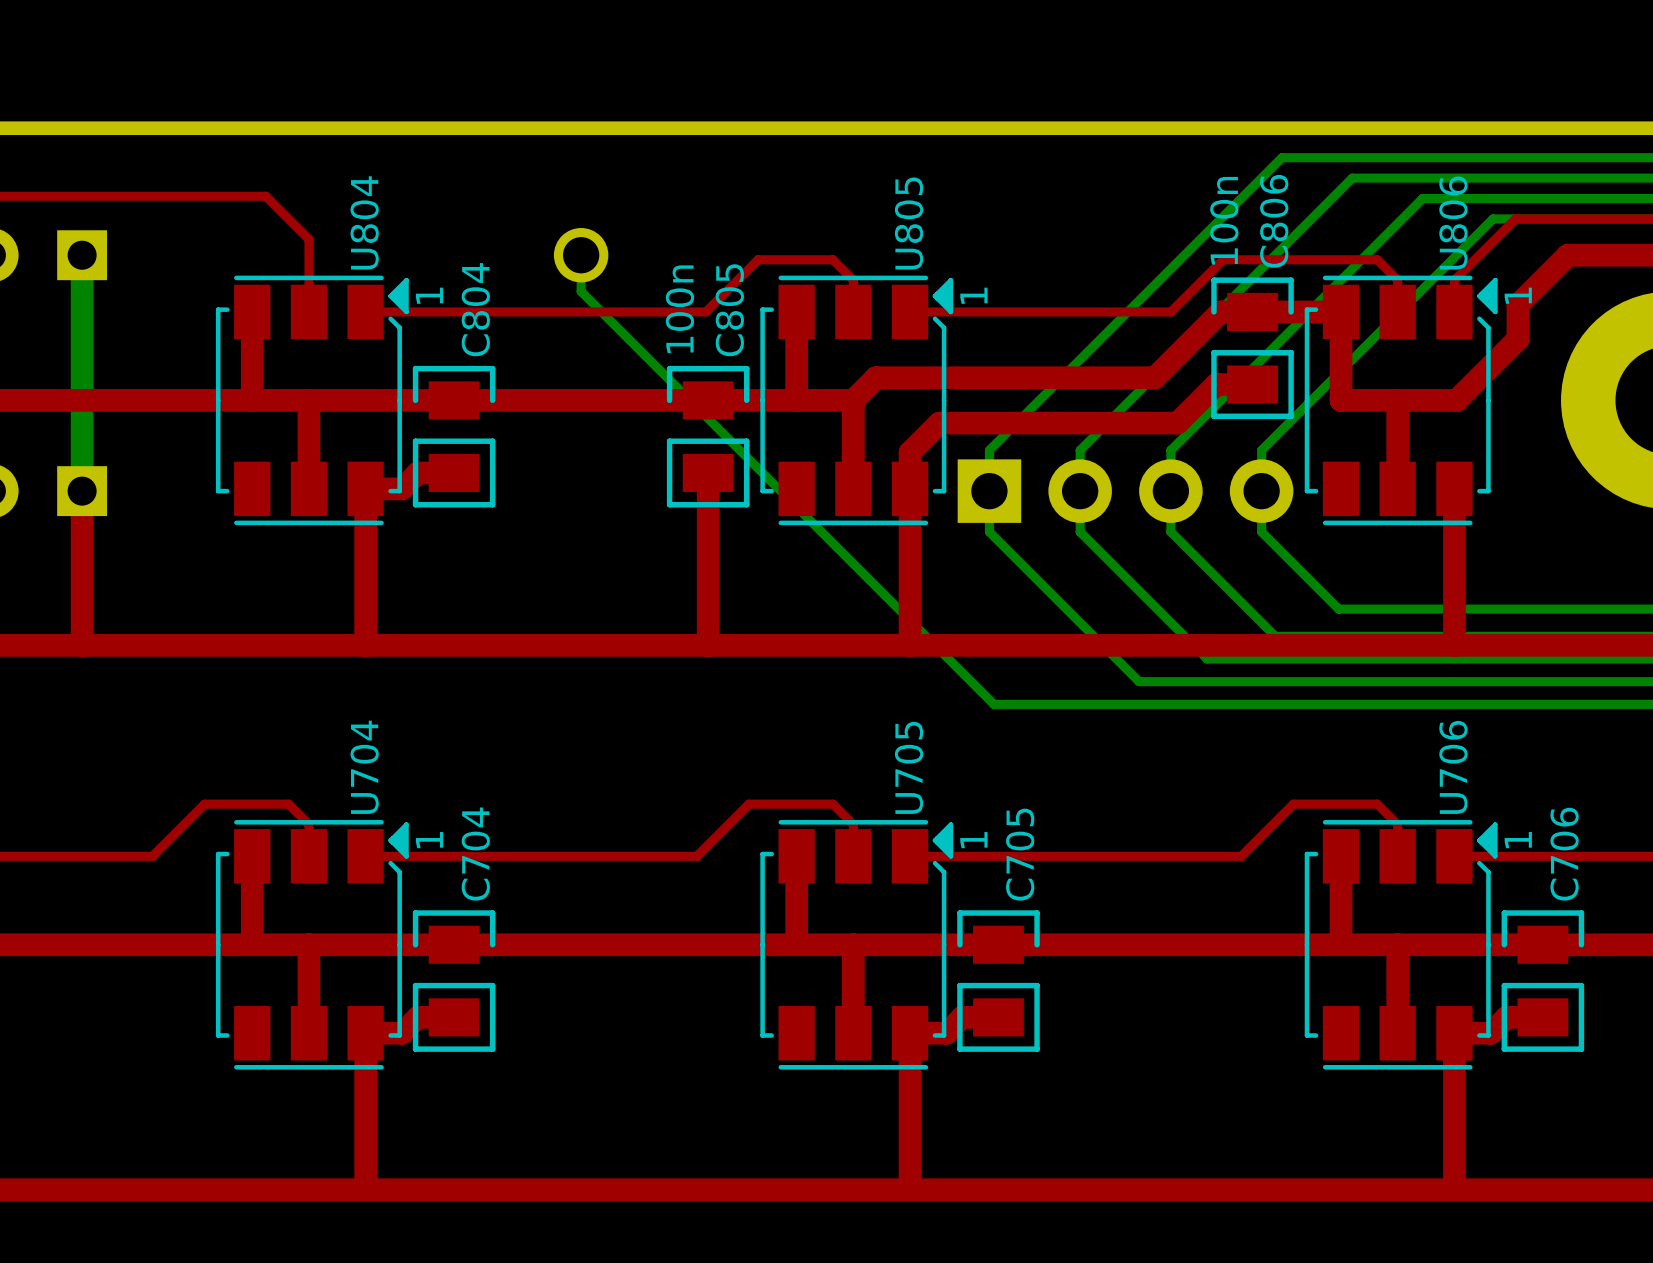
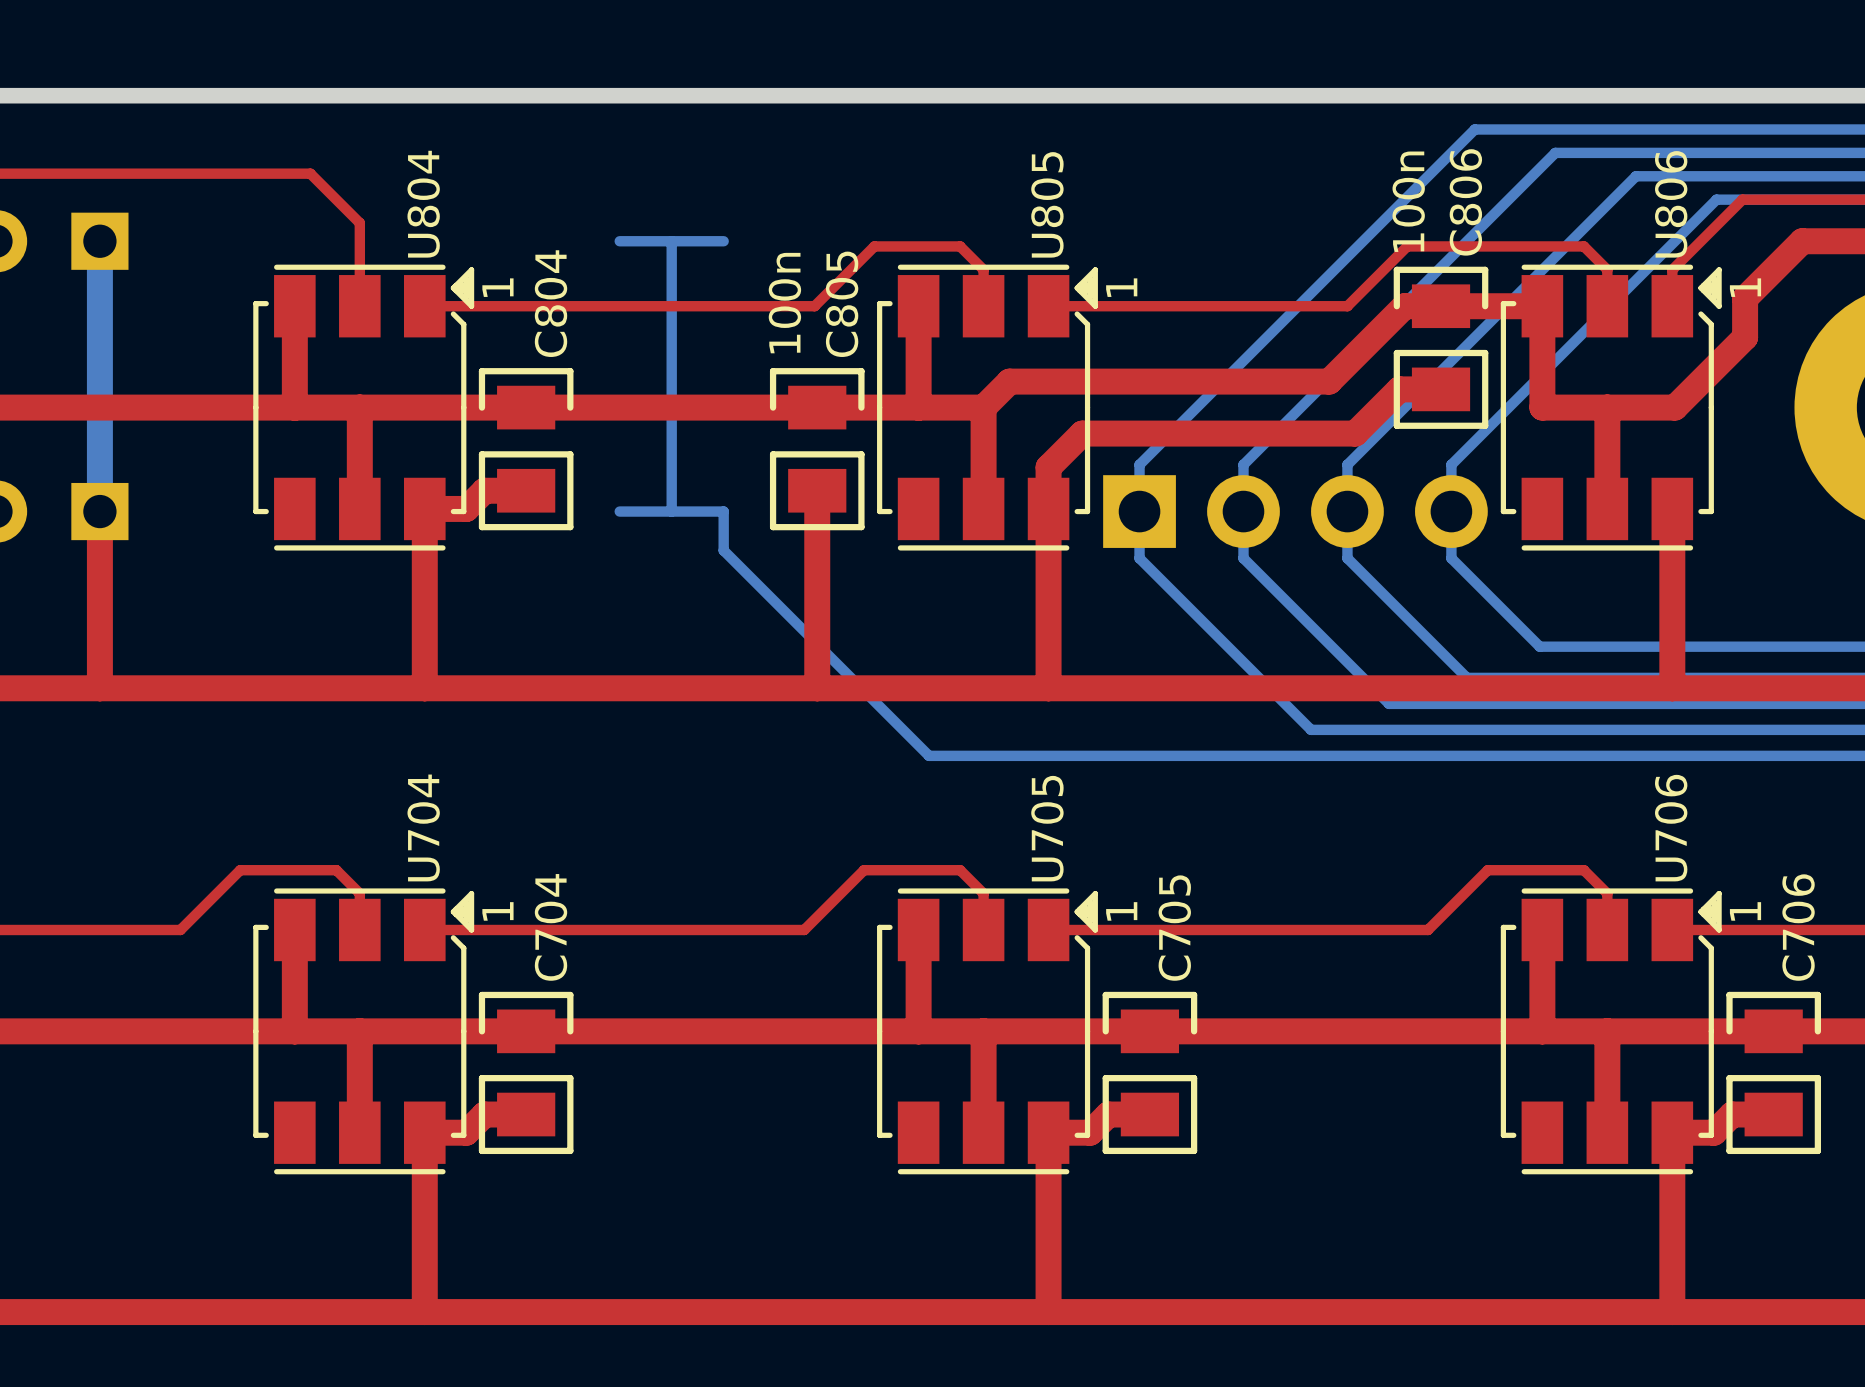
bottom track: none -> (619, 241) (723, 241)
part: (581, 255) -> none
bottom track: (581, 291) (993, 704) -> (619, 511) (723, 511) (723, 550) (929, 755) (1144, 755)
bottom track: none -> (671, 282) (671, 511)

